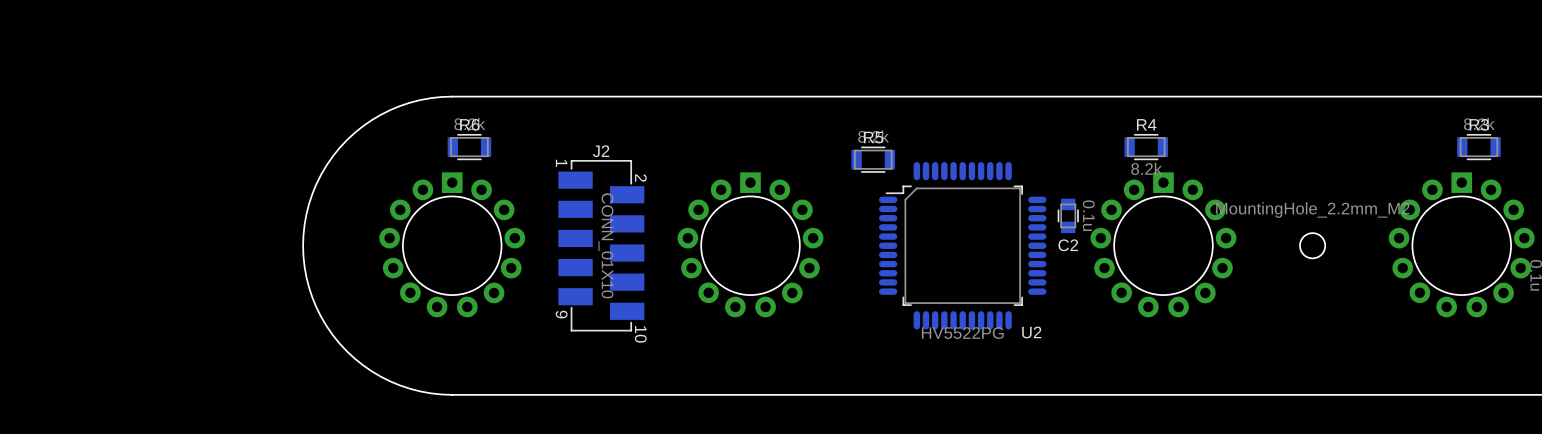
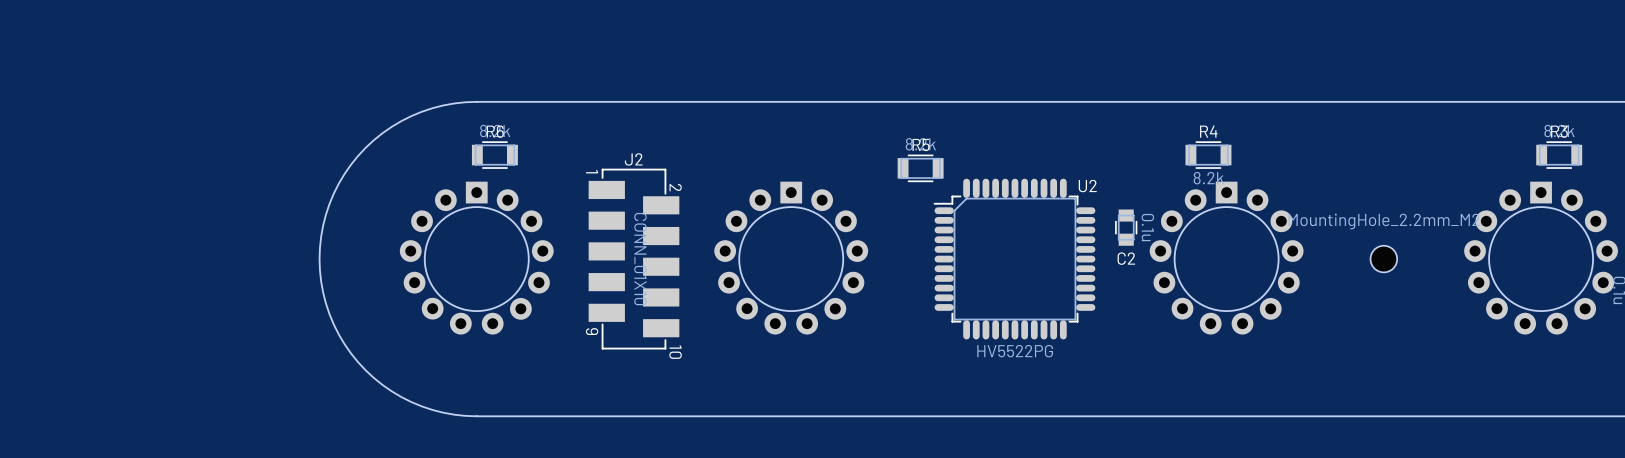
U2 footprint: [878, 161, 1047, 330] -> [933, 178, 1096, 340]
U2 name position: U2 (1031, 332) -> U2 (1087, 186)

